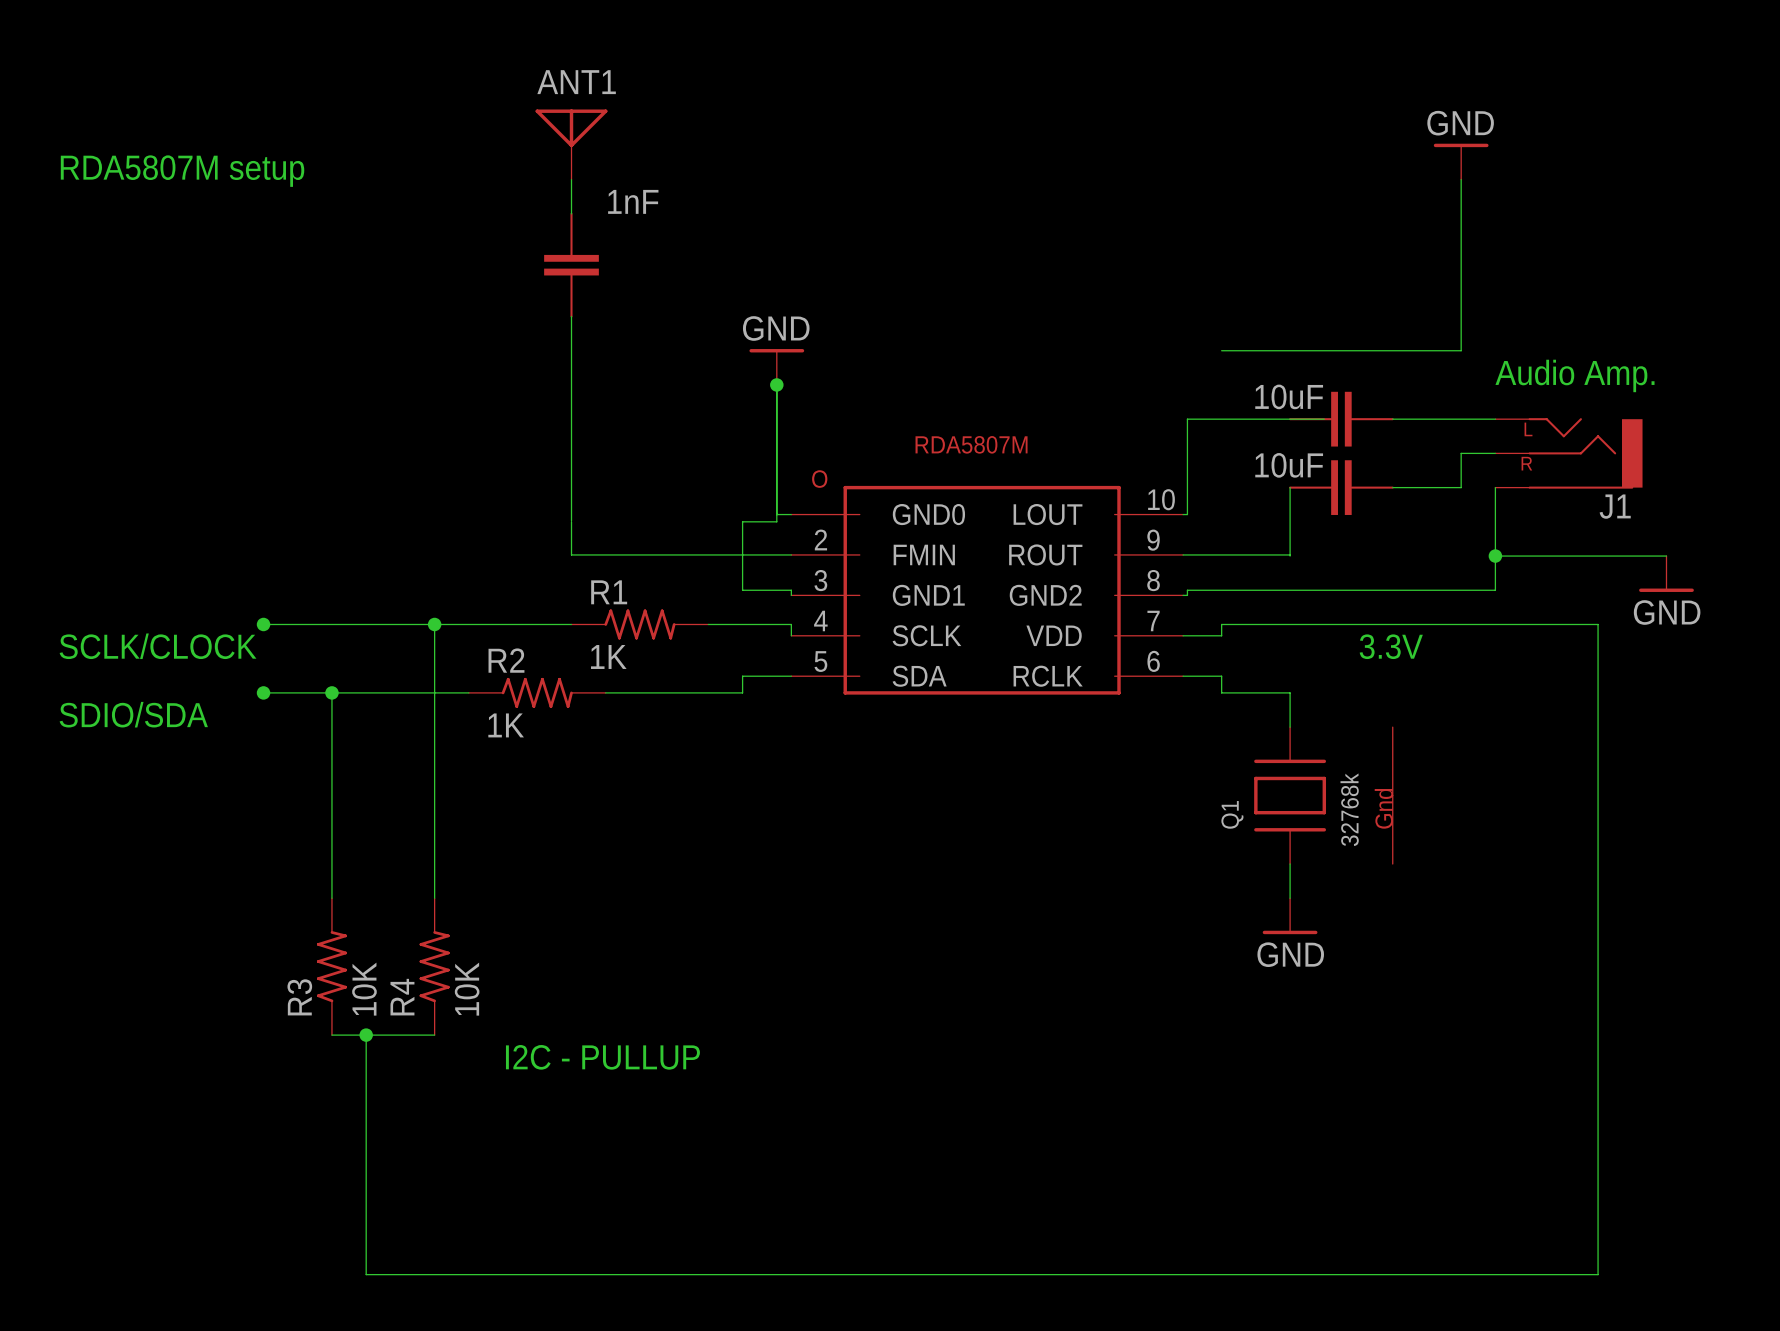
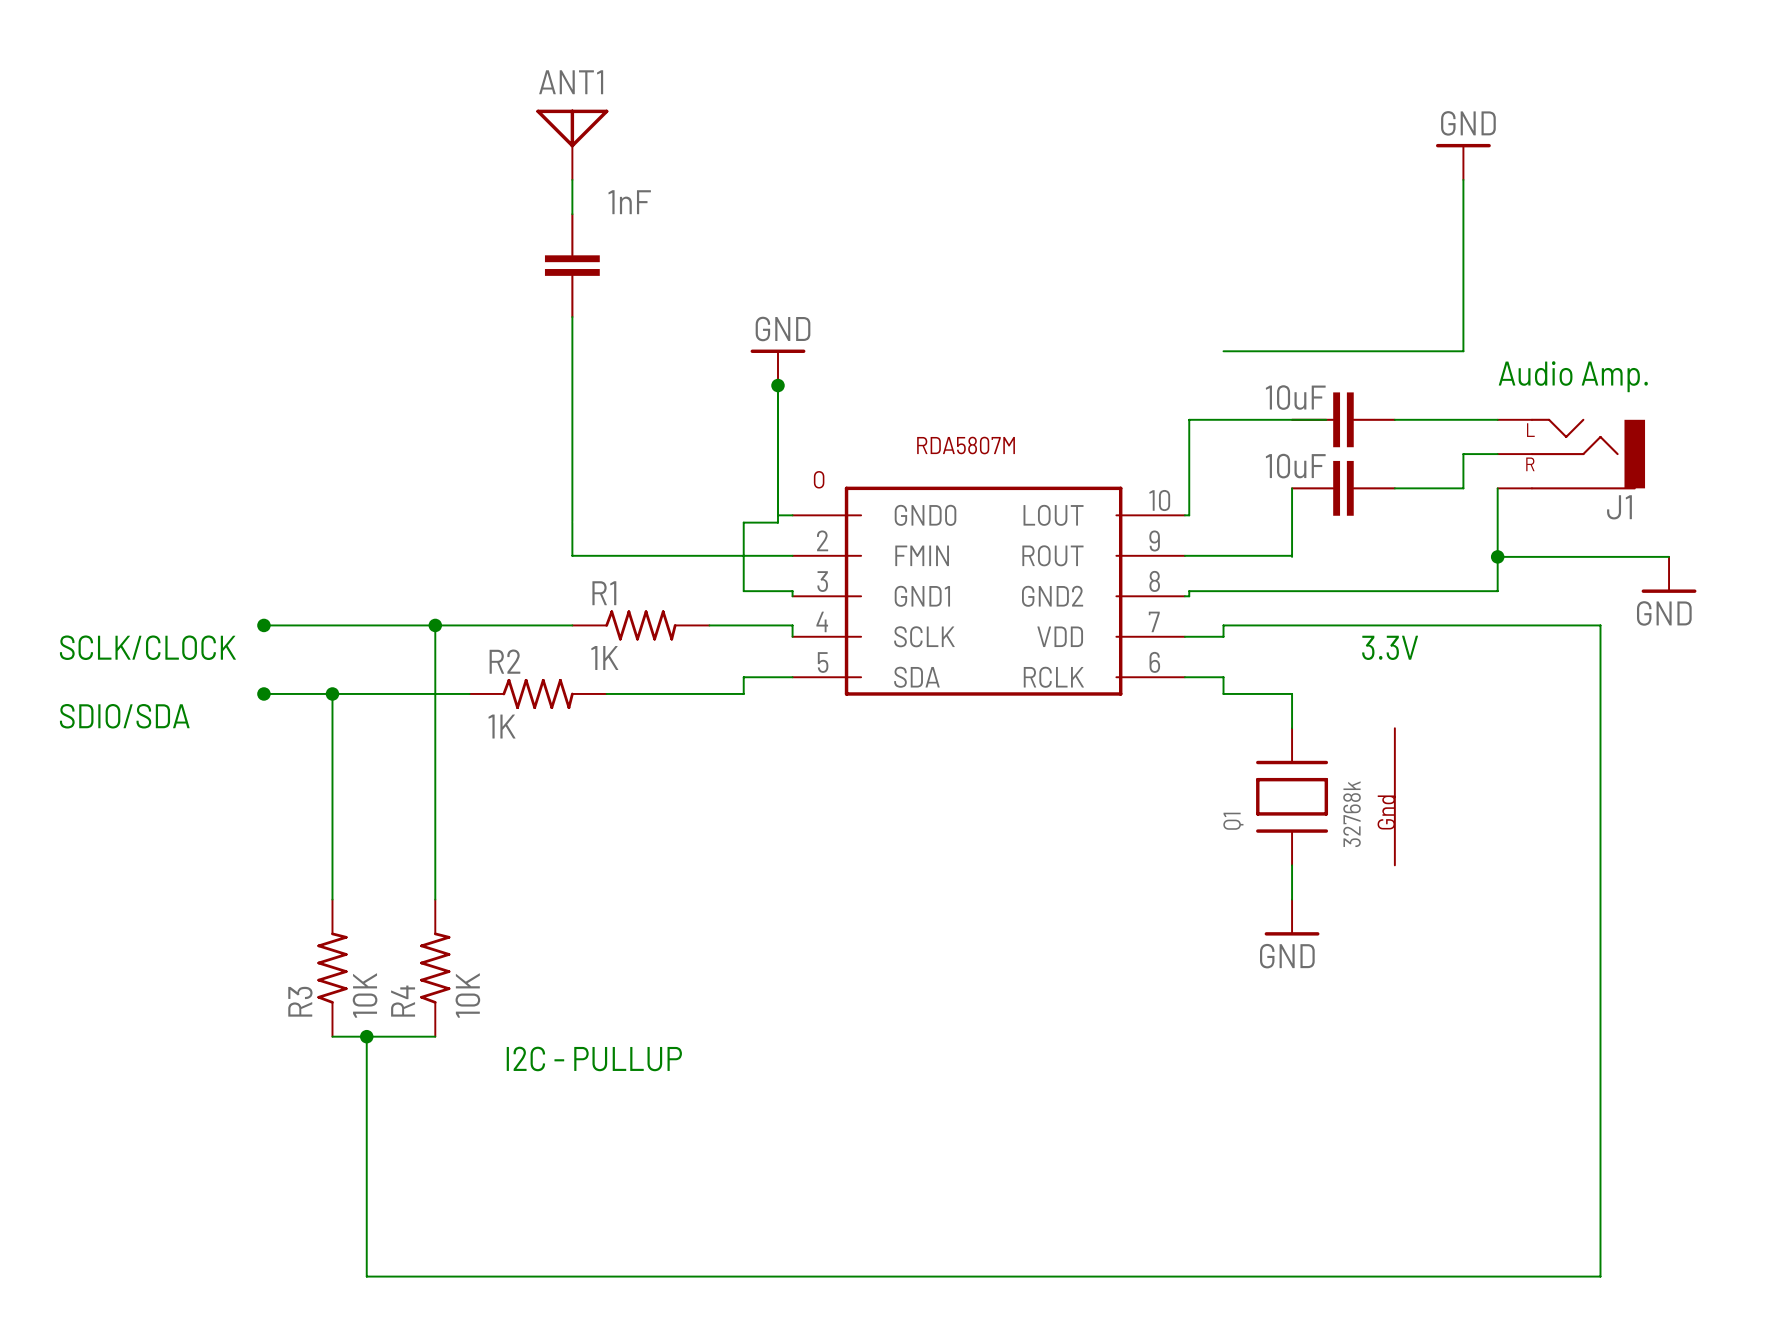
text: RDA5807M setup (182, 171) -> none

